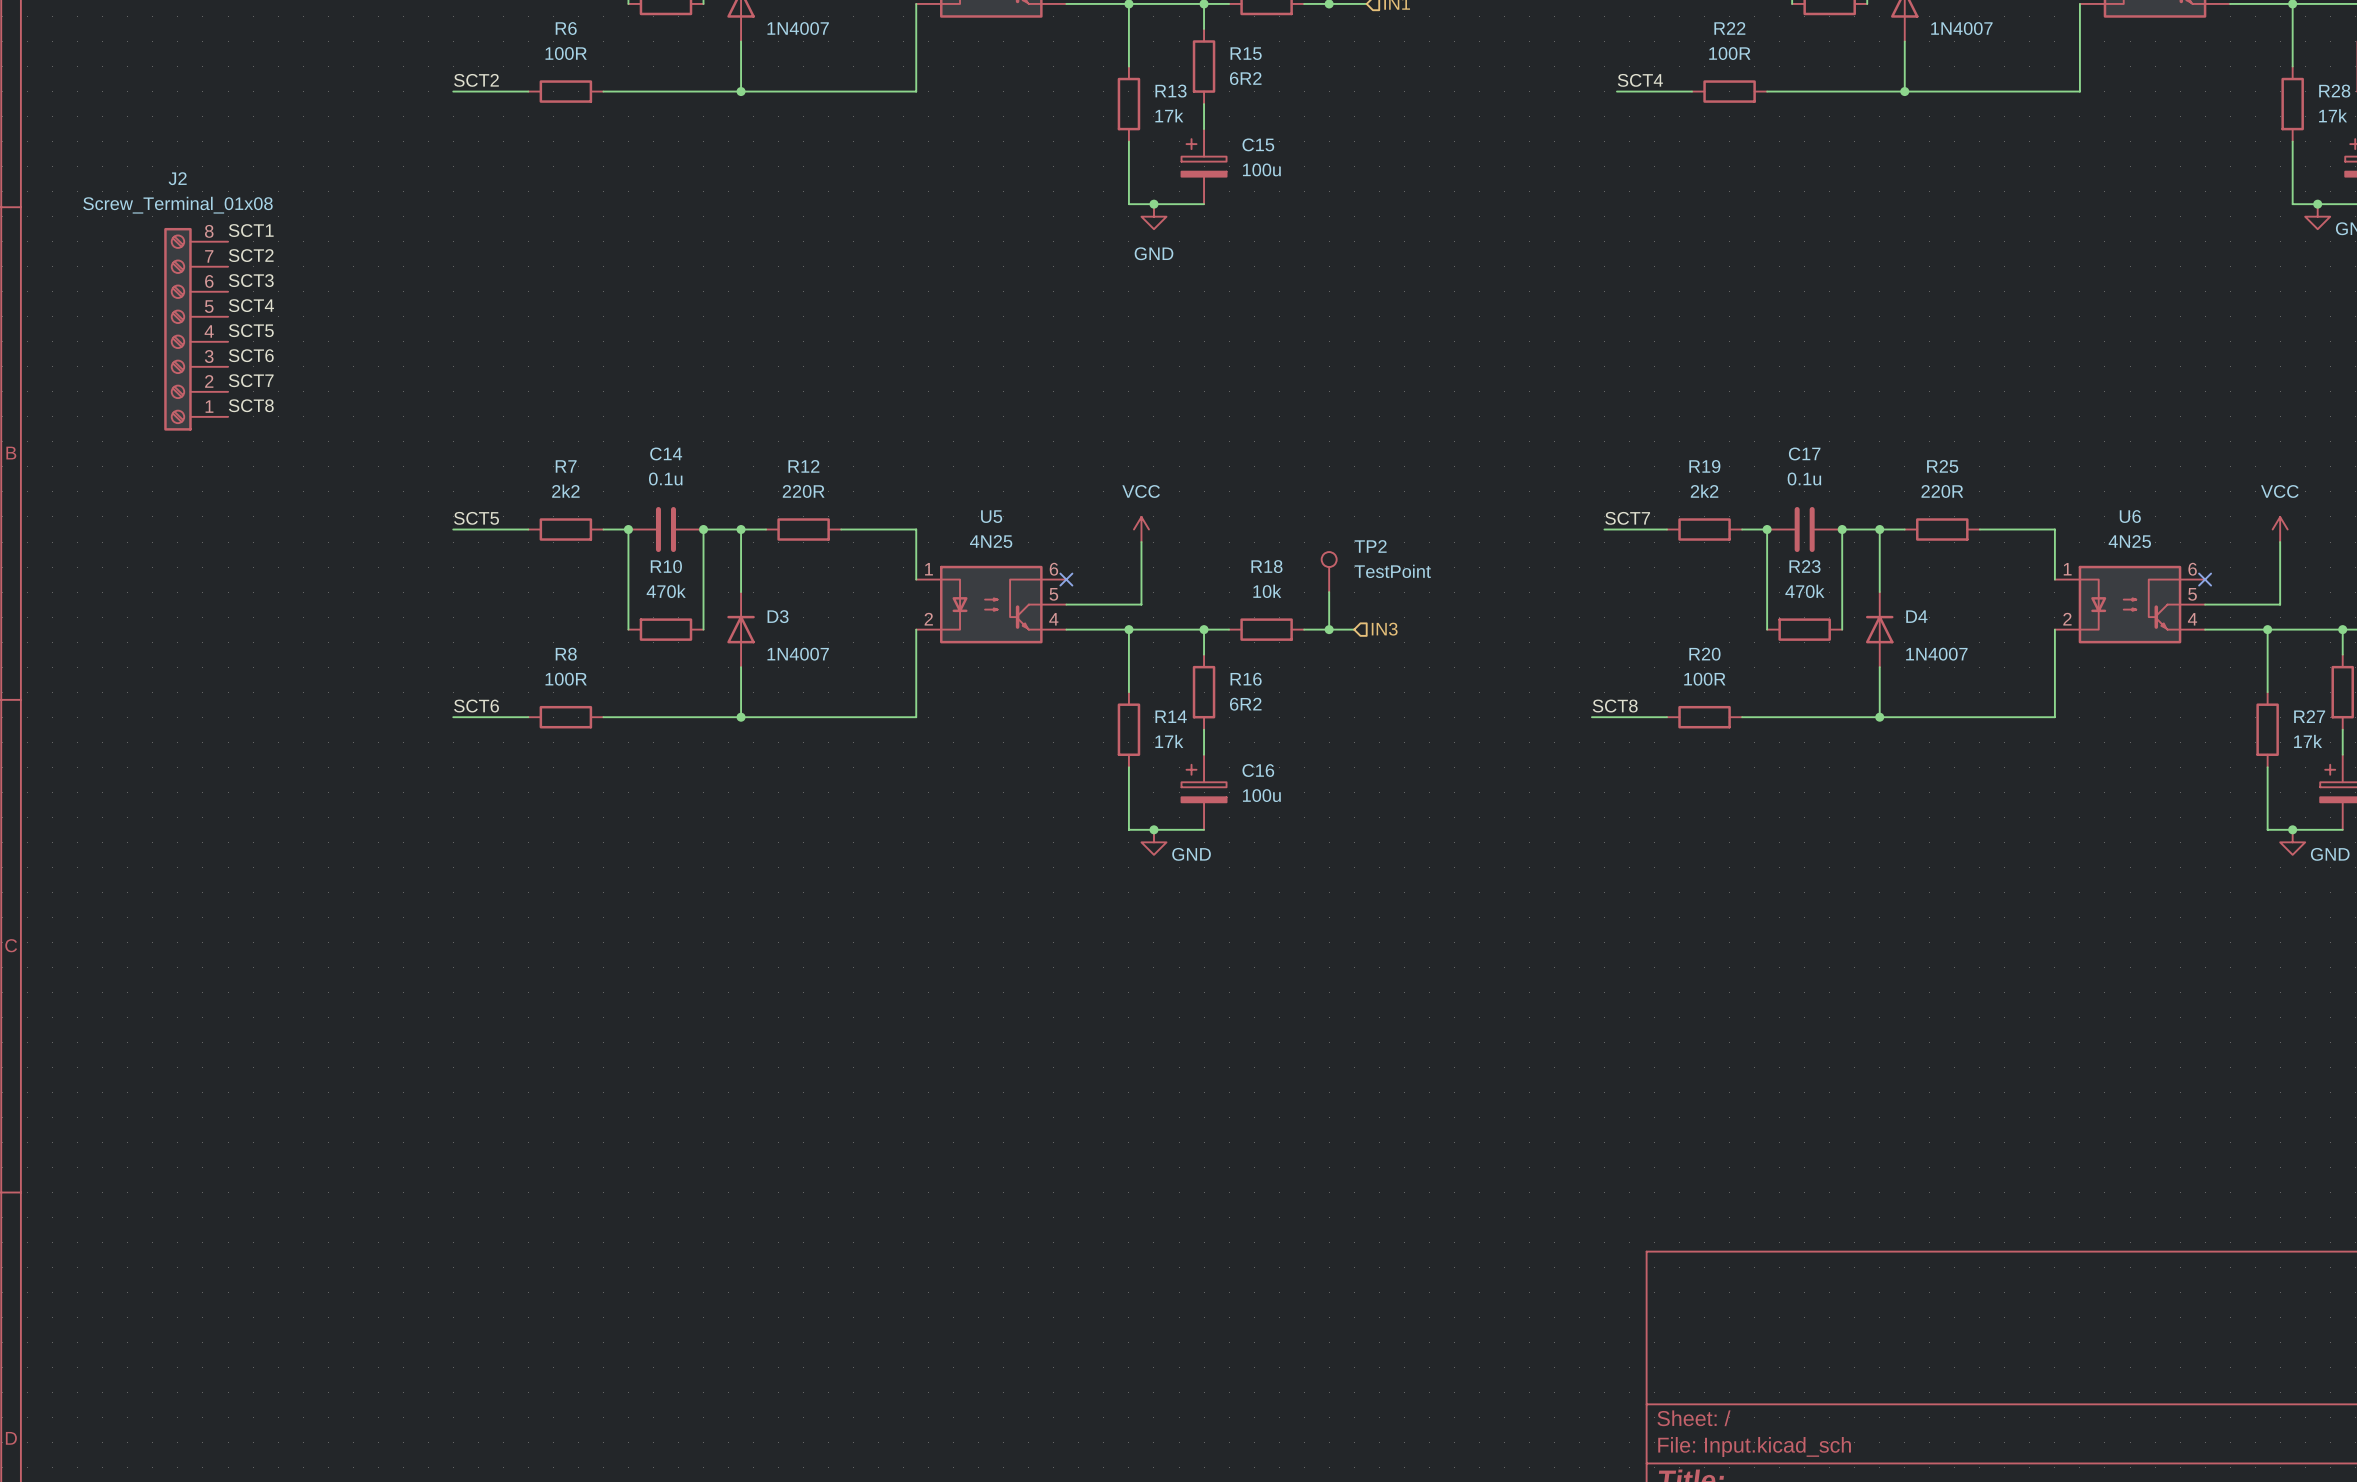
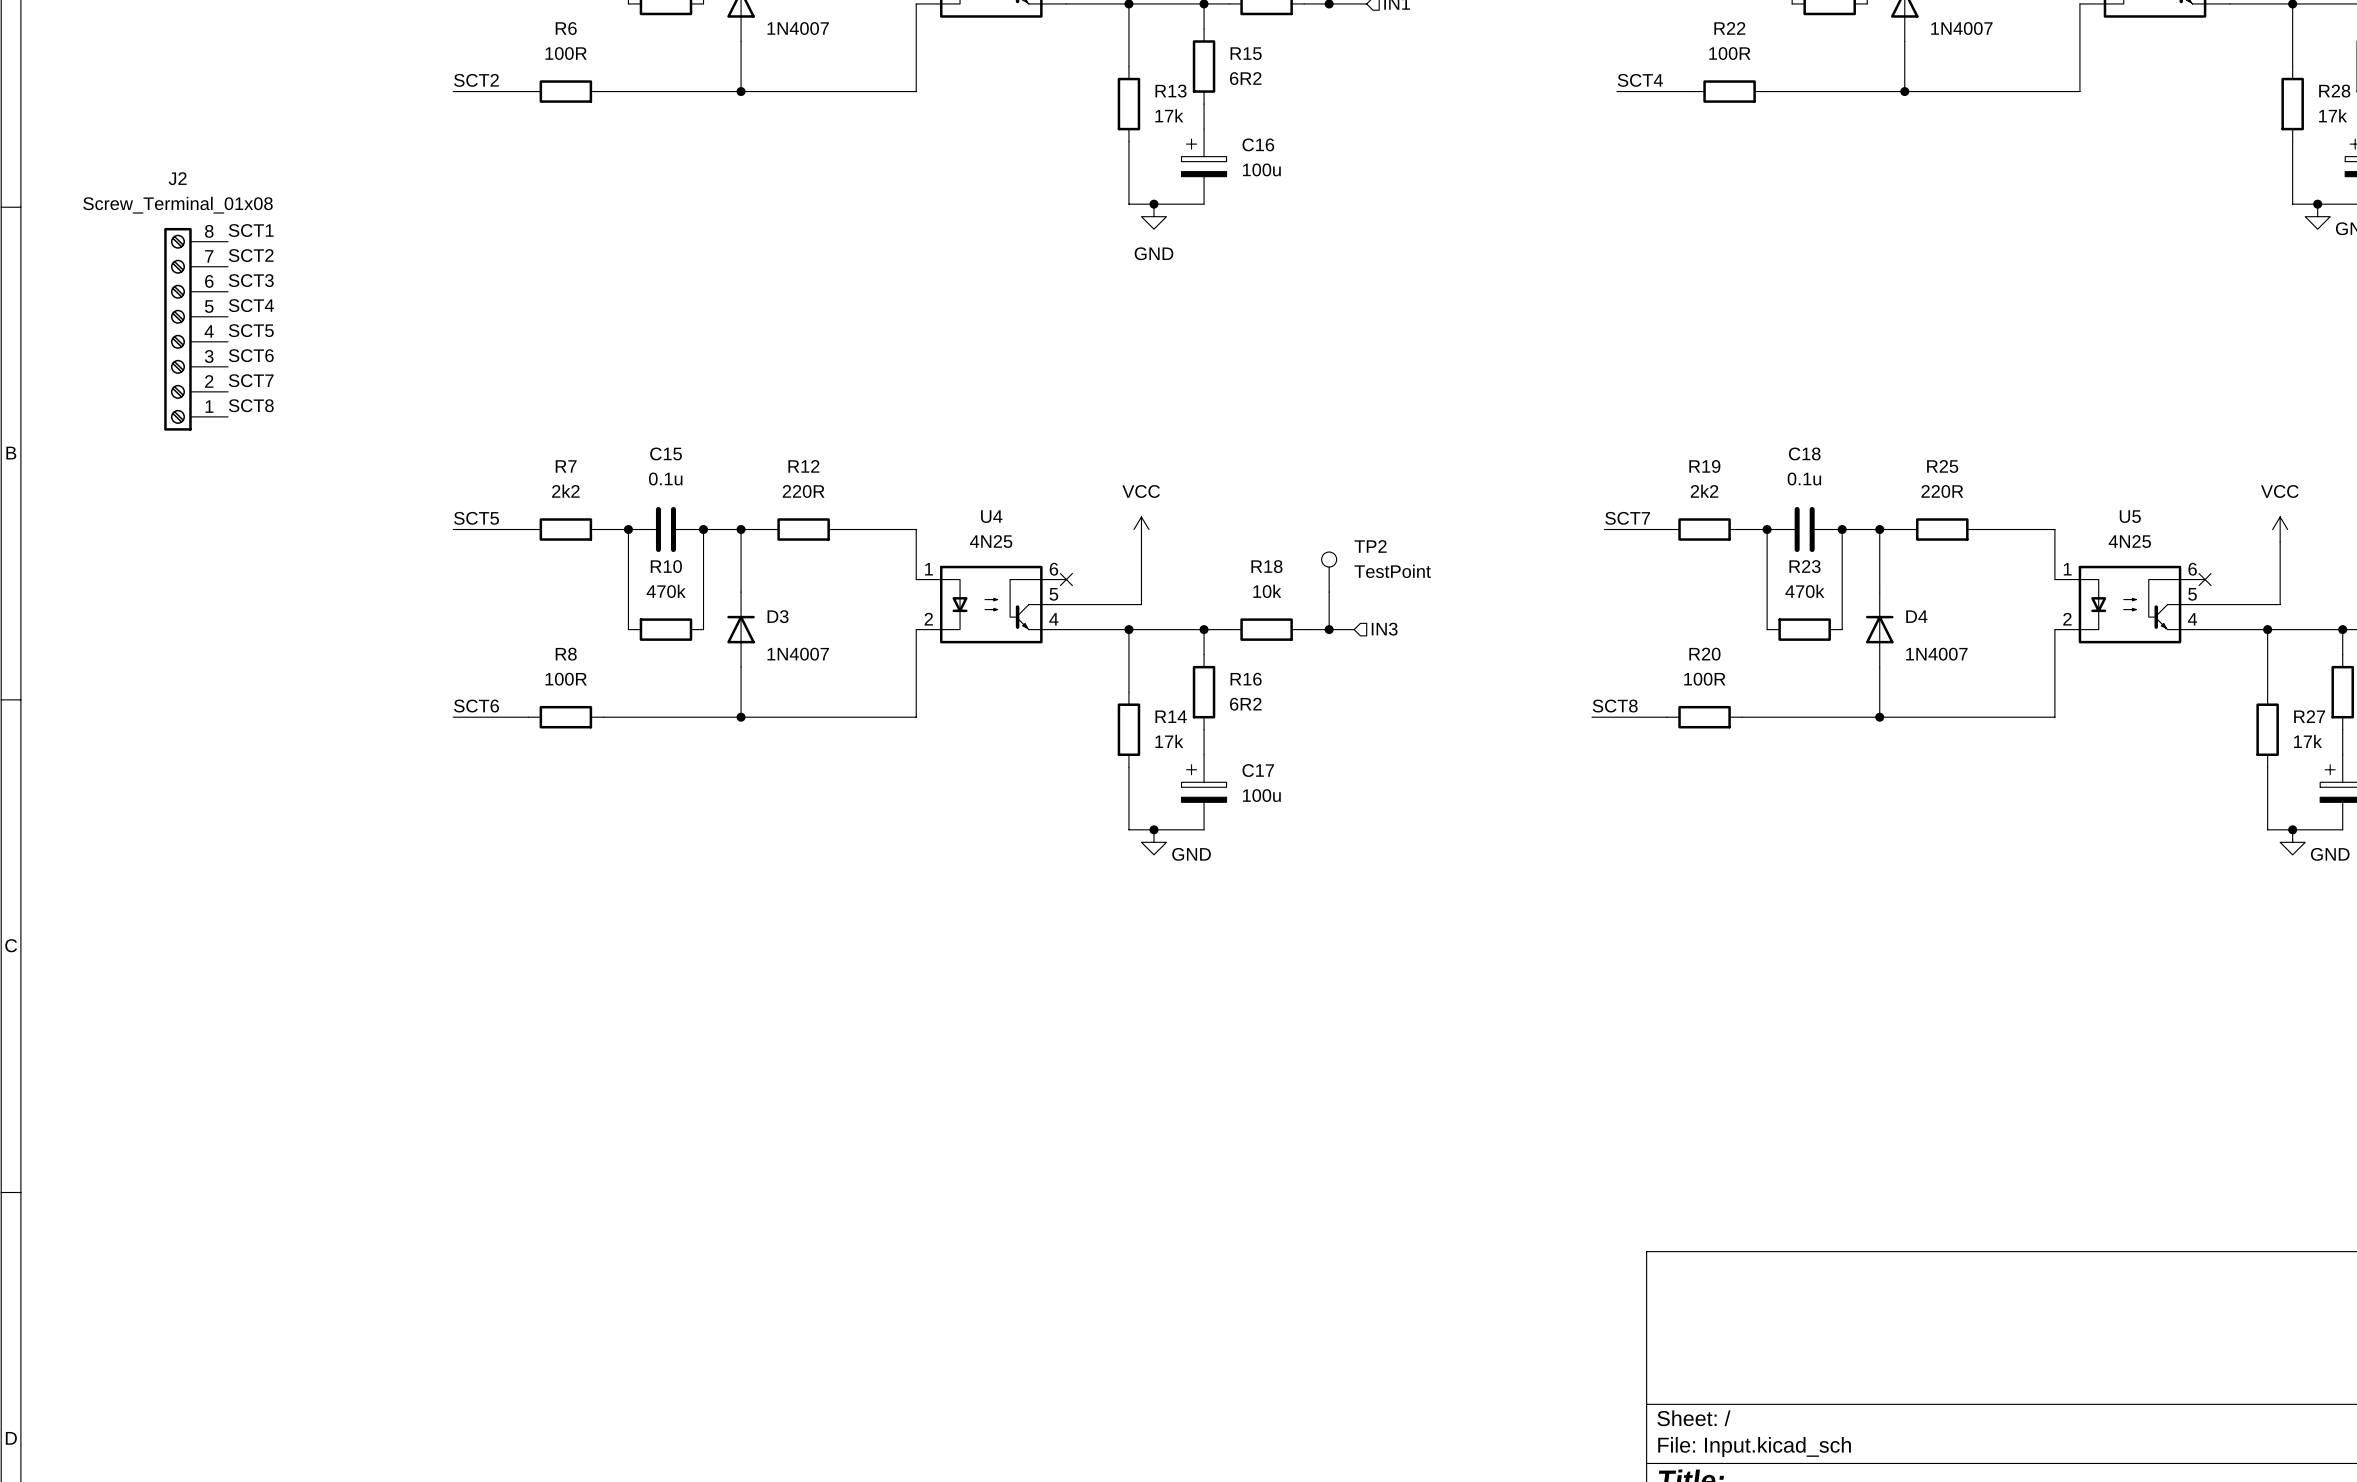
C15 name: C15 (1258, 144) -> C16 (1258, 144)
C14 name: C14 (666, 453) -> C15 (666, 453)
C17 name: C17 (1804, 453) -> C18 (1804, 453)
U5 name: U5 (991, 516) -> U4 (991, 516)
U6 name: U6 (2130, 516) -> U5 (2130, 516)
C16 name: C16 (1258, 770) -> C17 (1258, 770)

